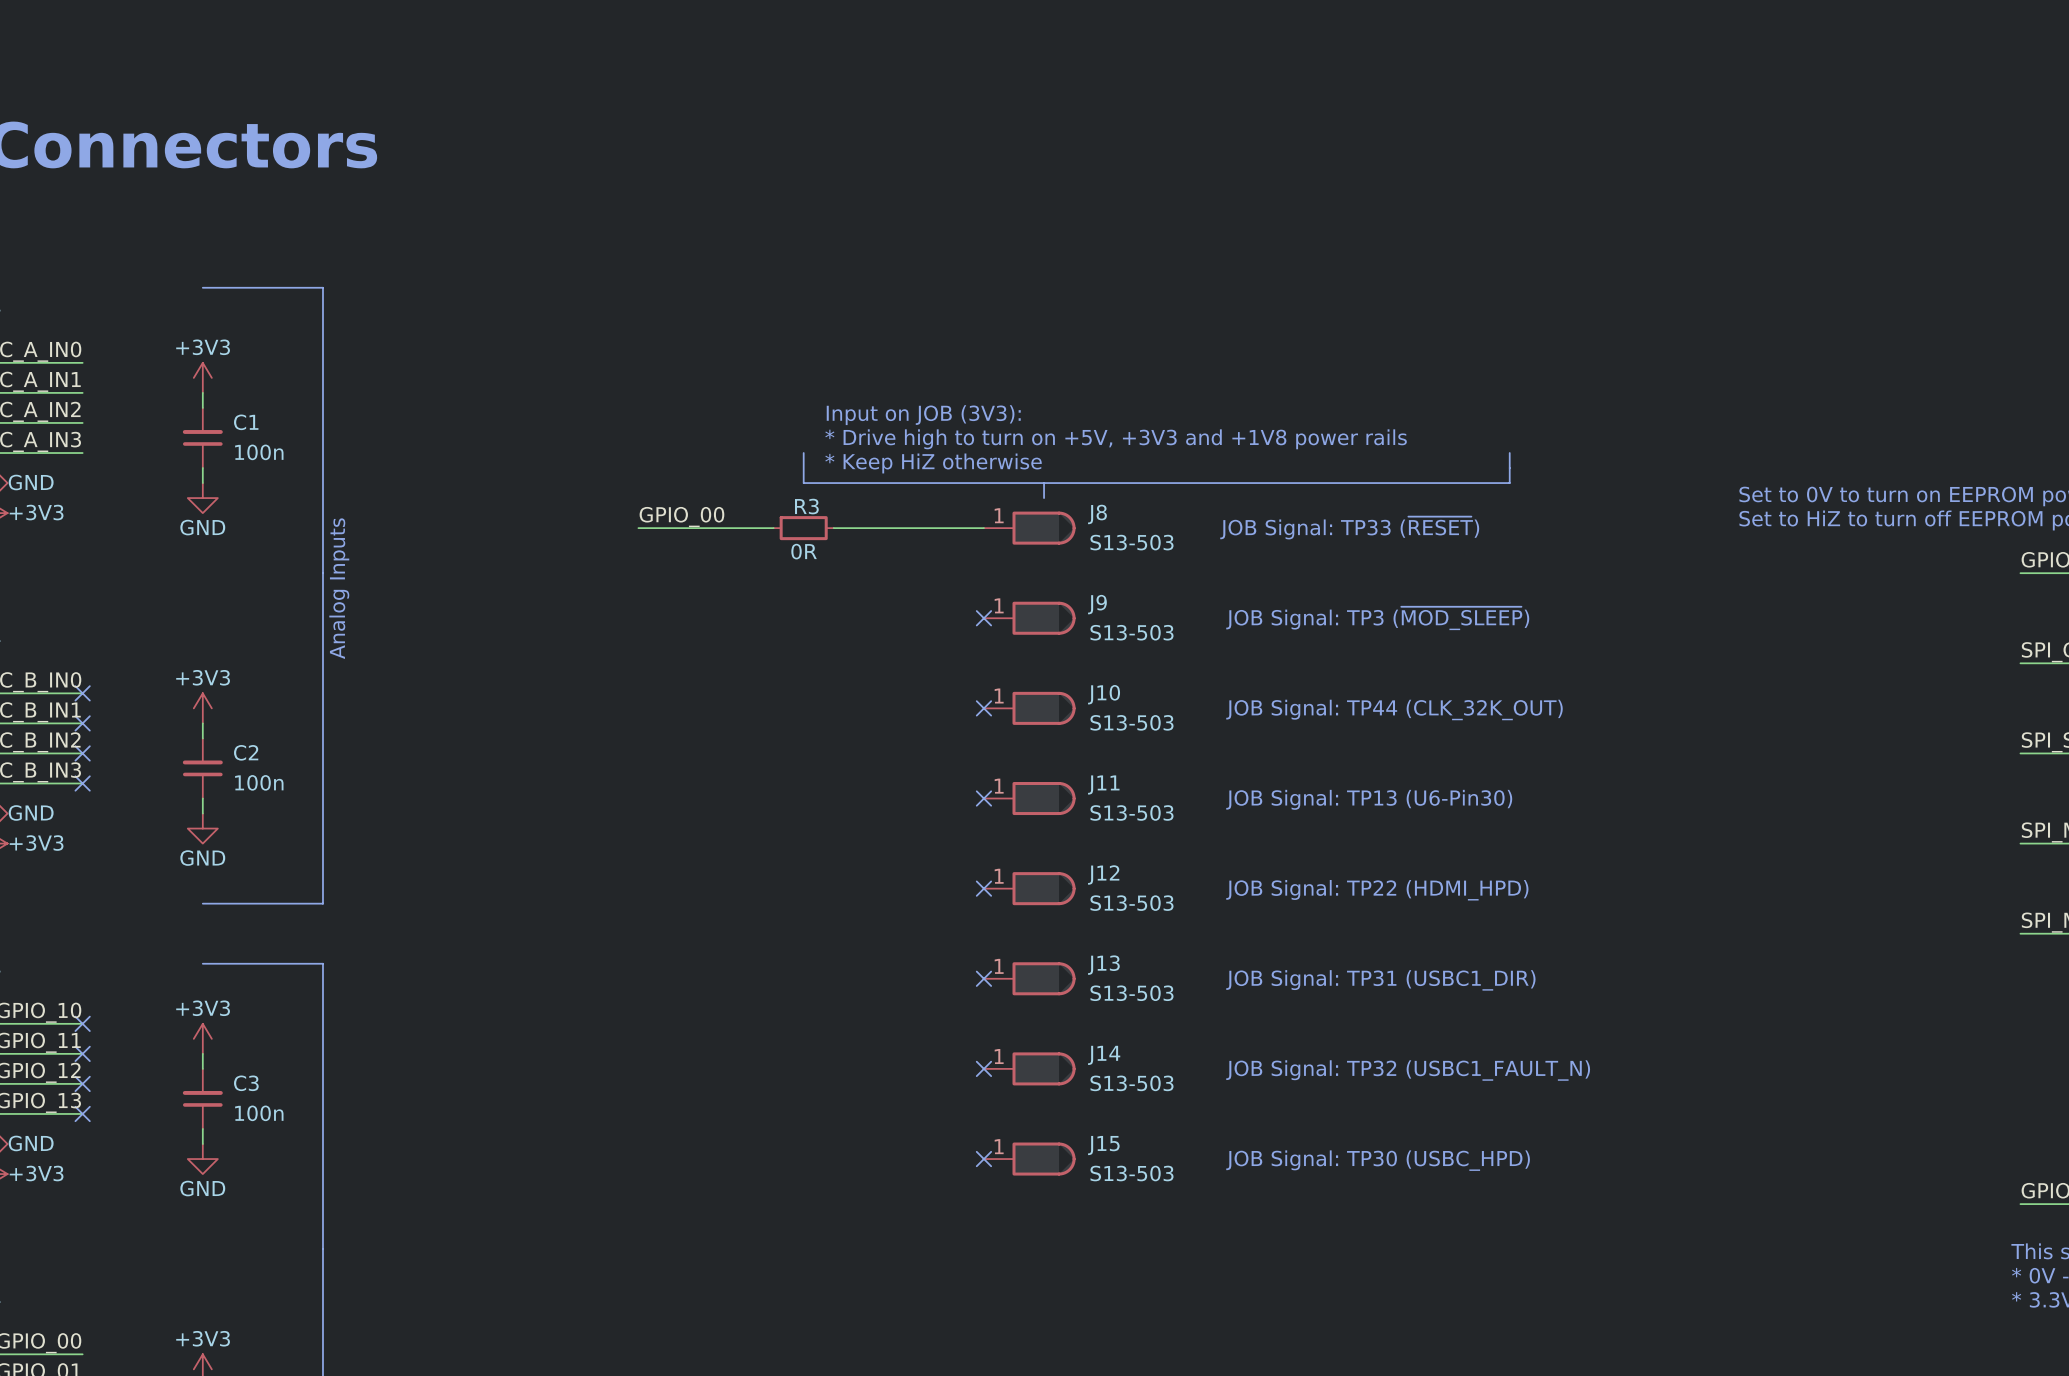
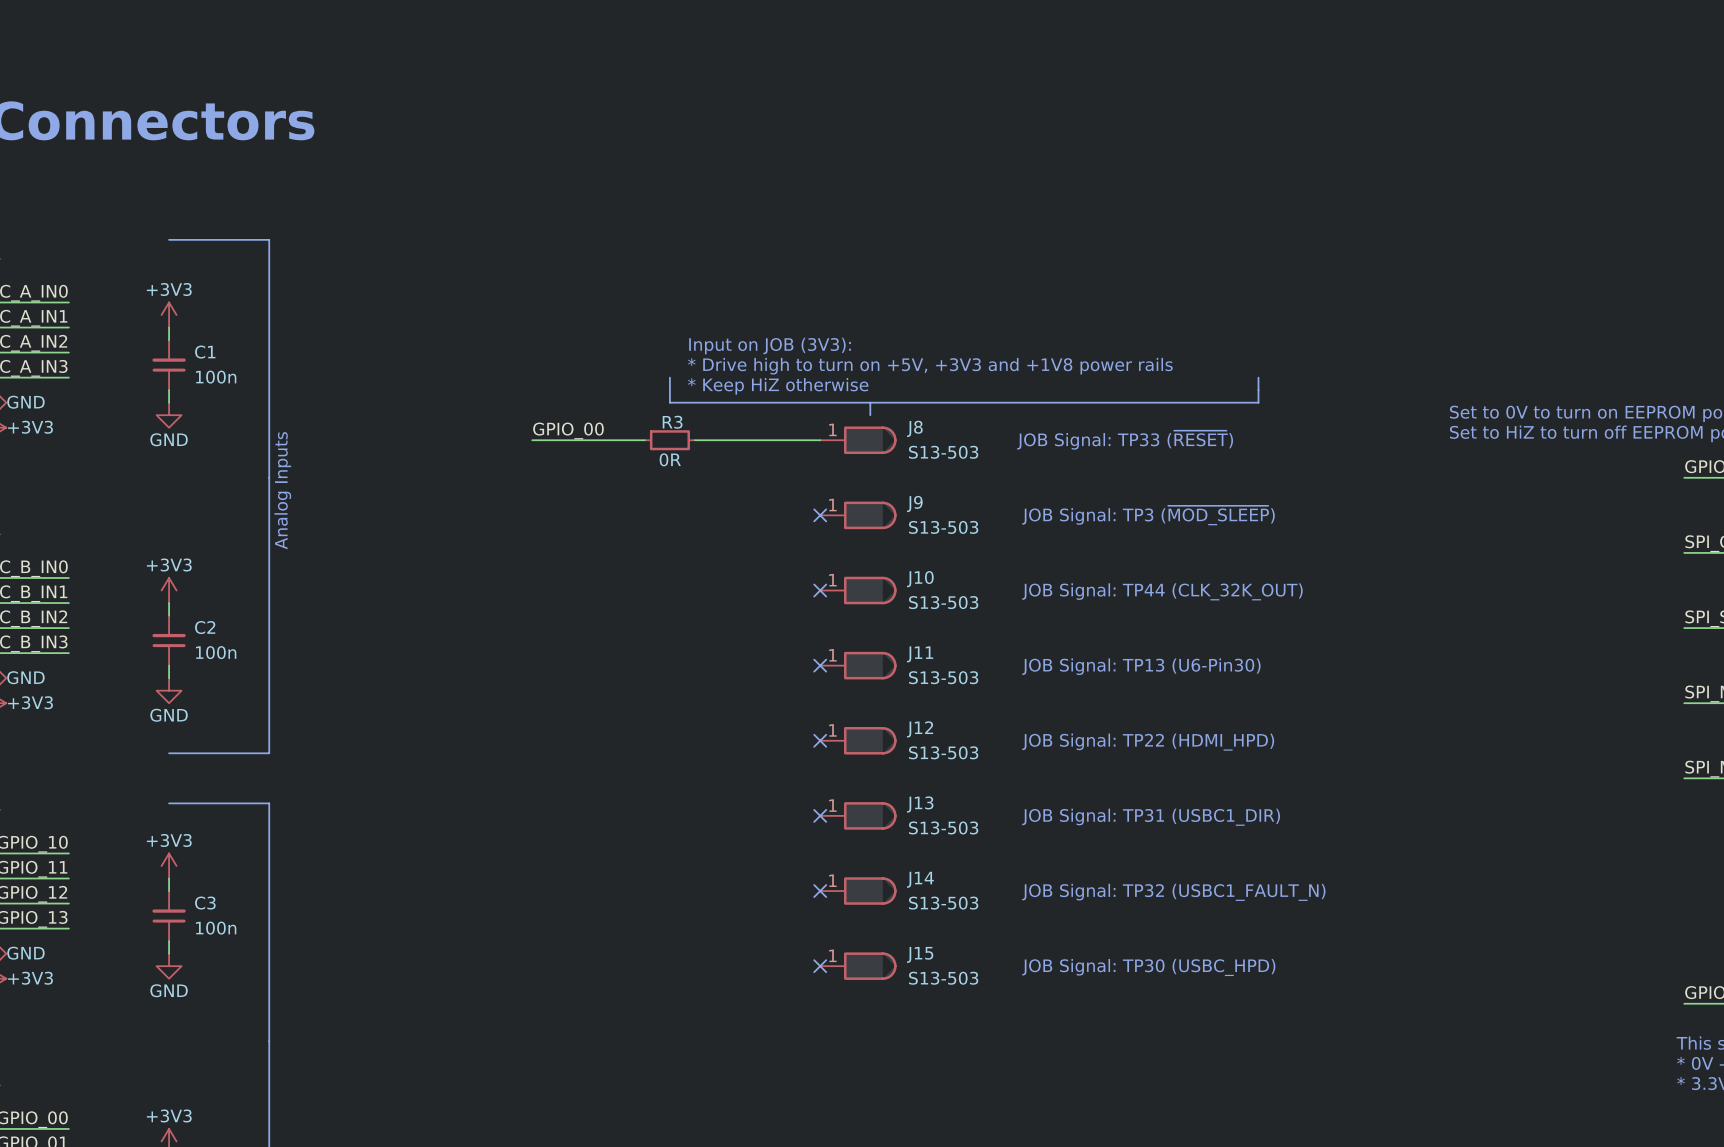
no-connect mark: (82, 693) -> none
no-connect mark: (82, 723) -> none
no-connect mark: (82, 753) -> none
no-connect mark: (82, 783) -> none
no-connect mark: (82, 1023) -> none
no-connect mark: (82, 1053) -> none
no-connect mark: (82, 1083) -> none
no-connect mark: (82, 1113) -> none

